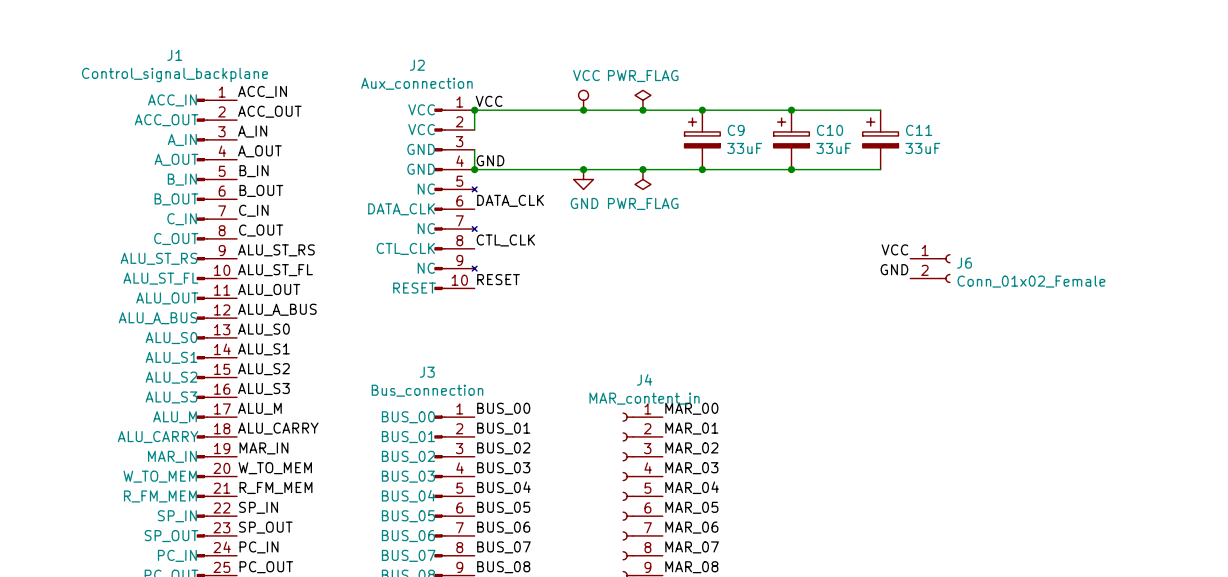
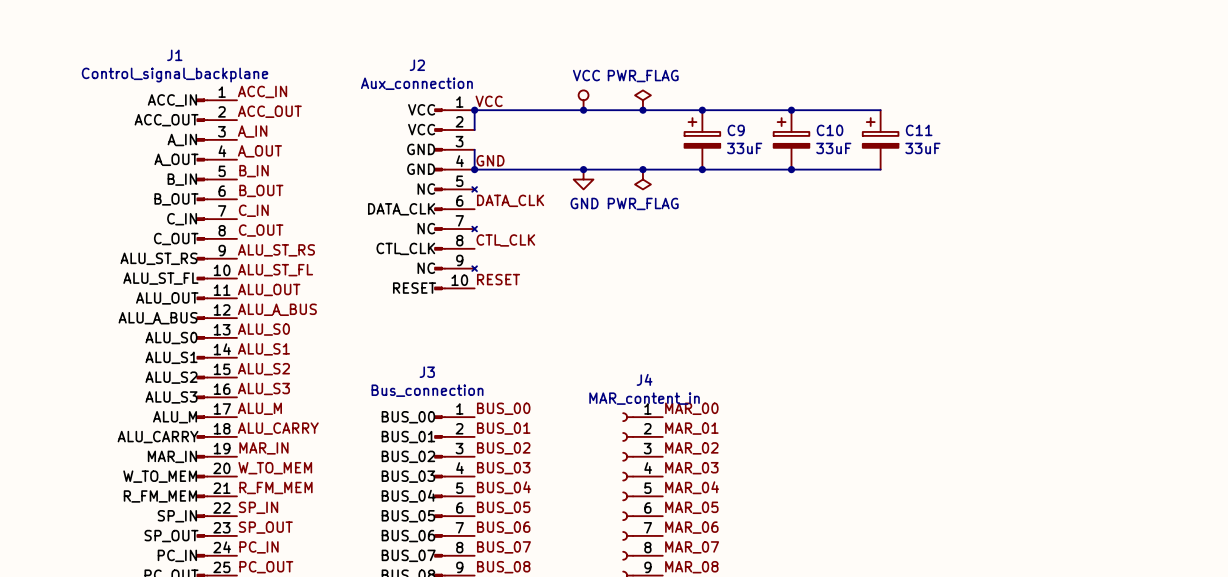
label: VCC (894, 249) -> none
J6: Conn_01x02_Female (930, 268) -> none
label: GND (894, 269) -> none

